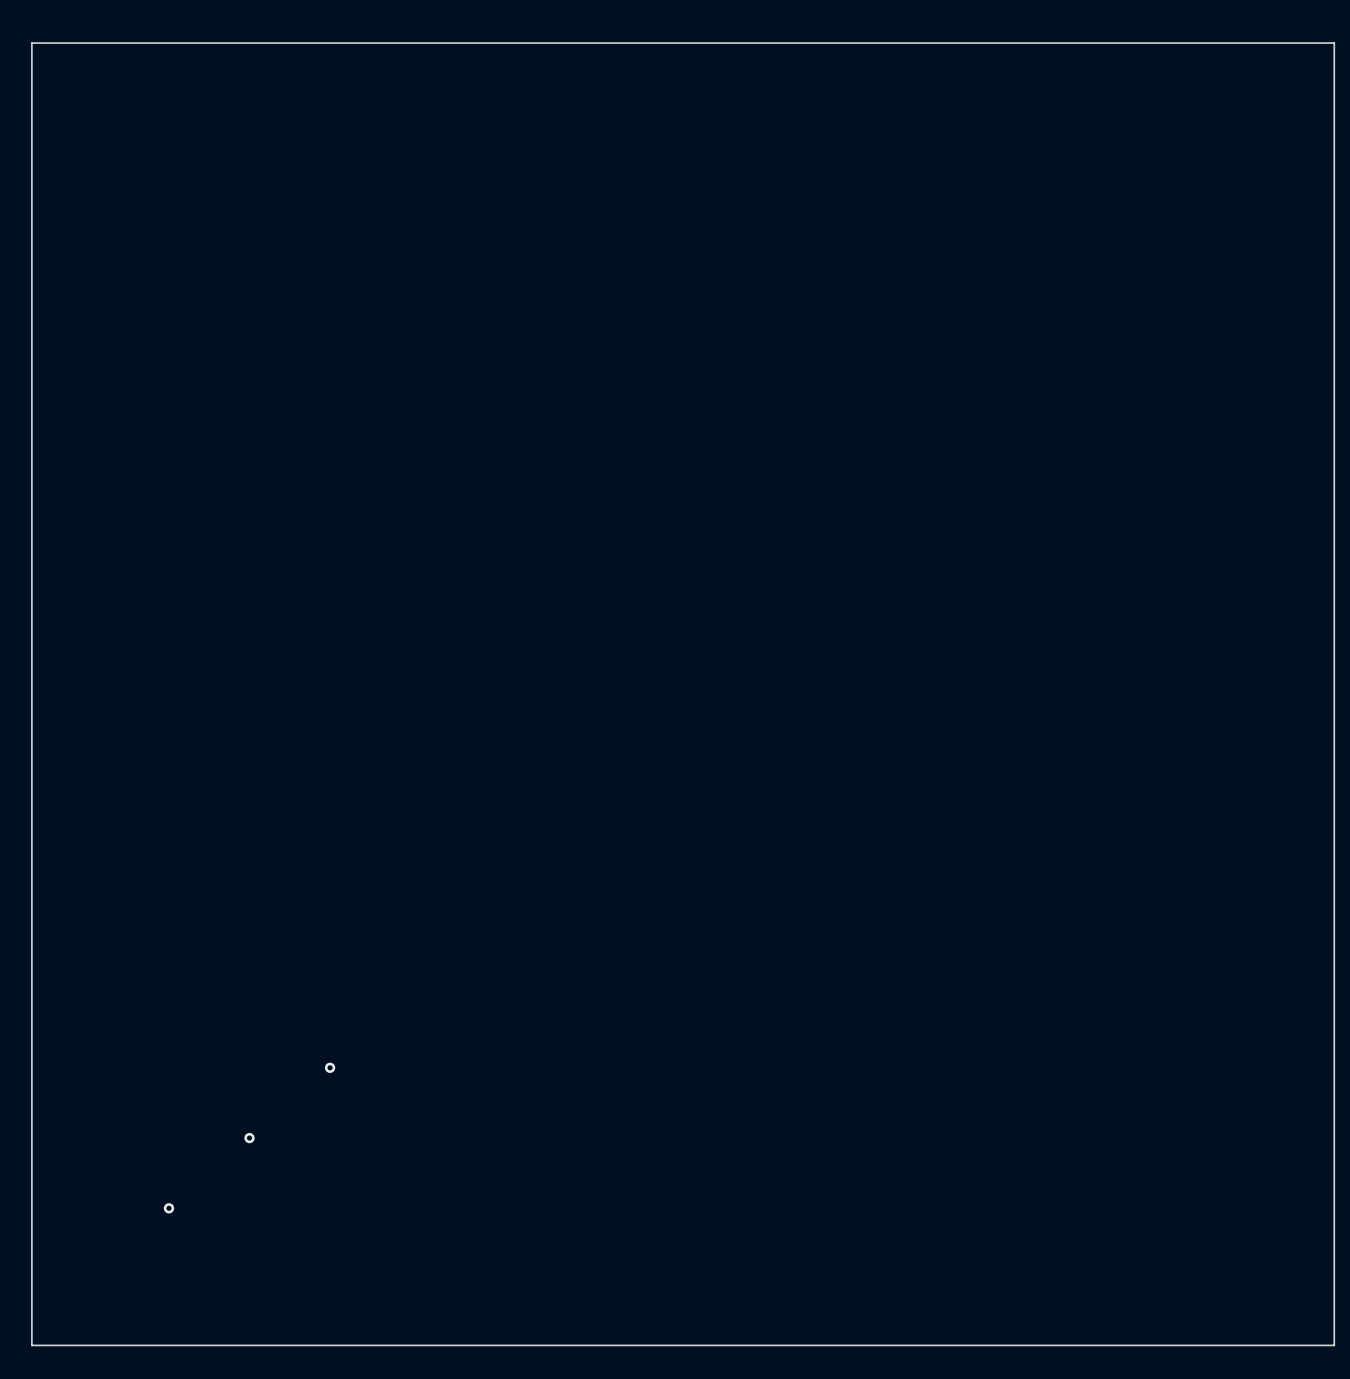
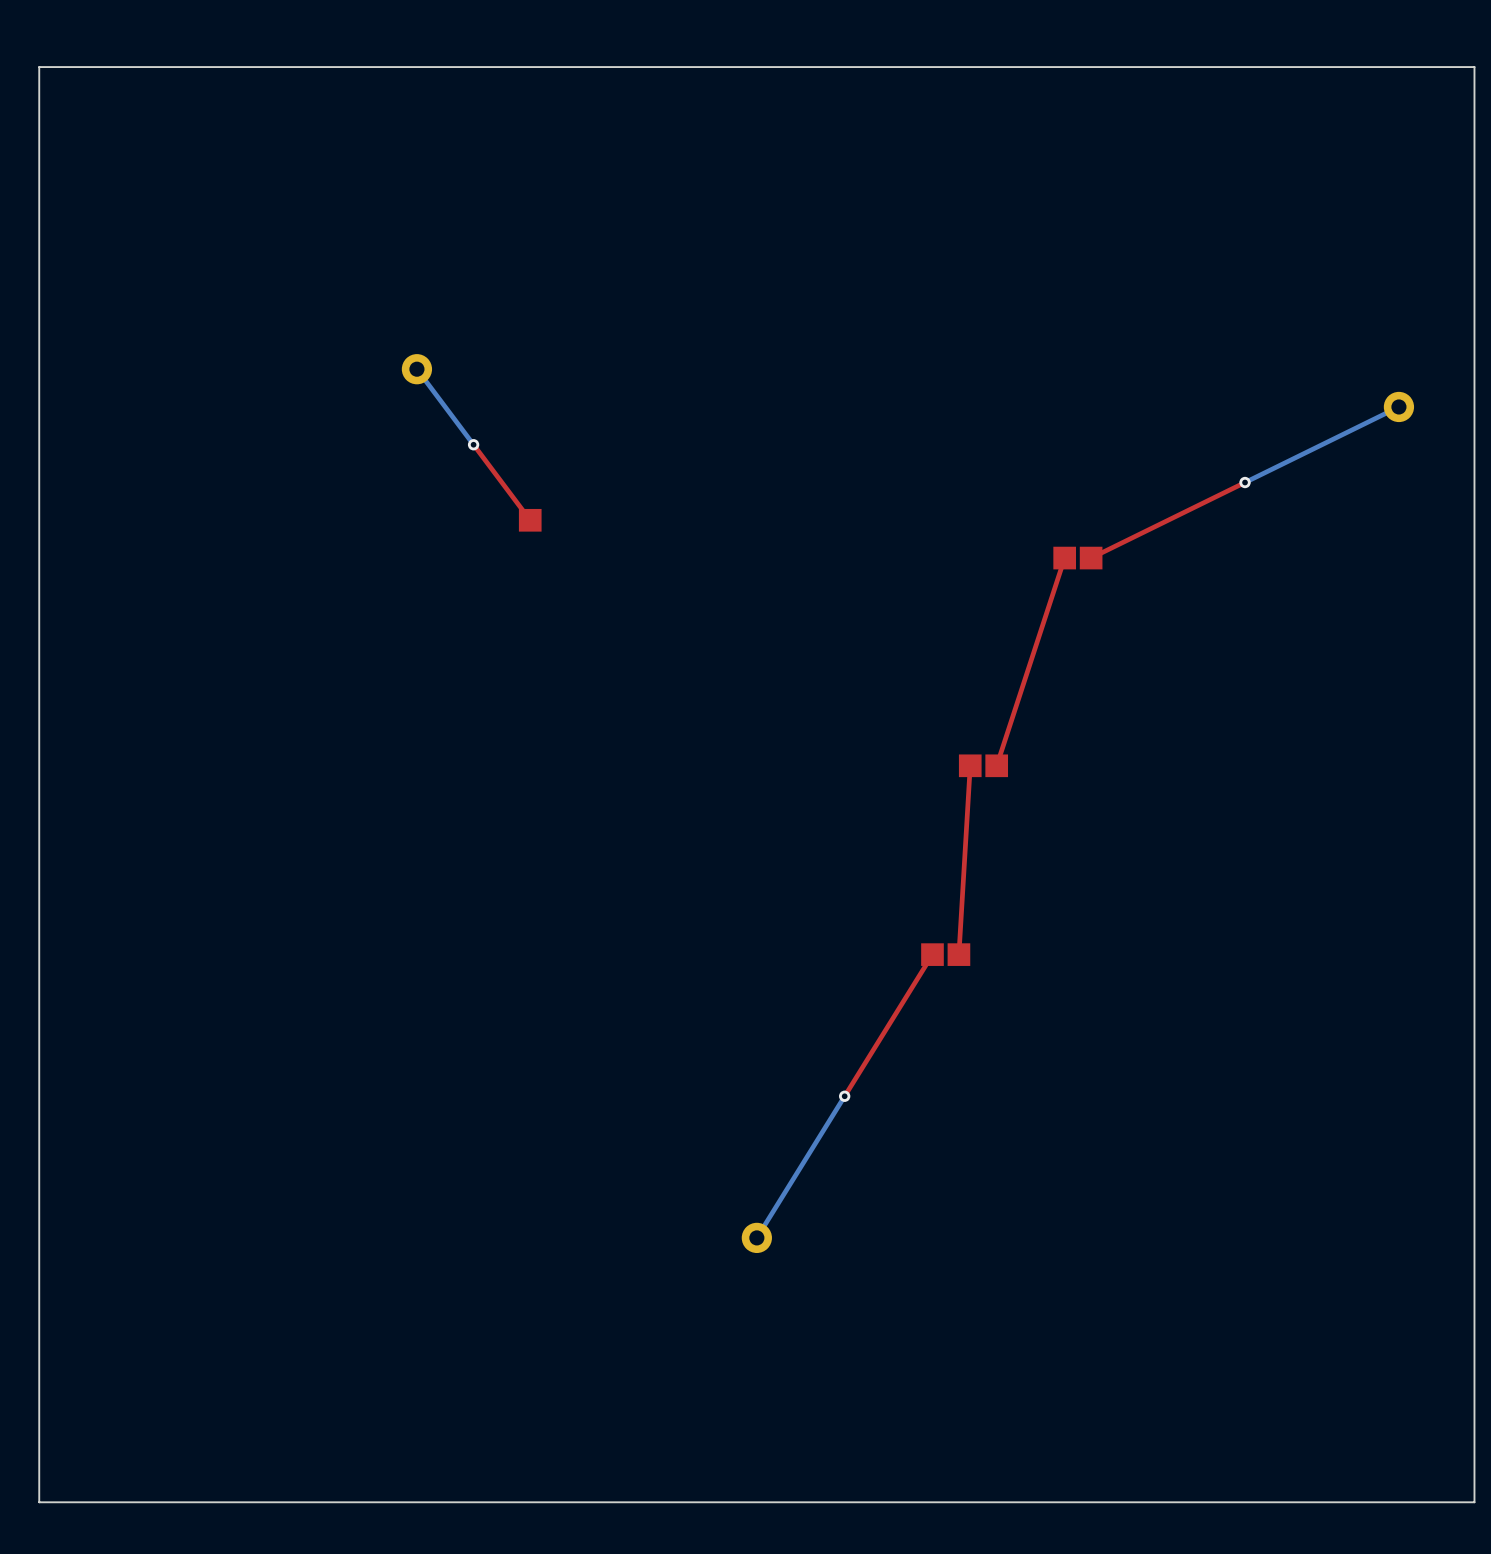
bottom track: none -> (416, 369) (473, 444)
part: none -> (416, 369)
bottom track: none -> (1398, 406) (1245, 482)
part: none -> (1398, 406)
top track: none -> (473, 444) (530, 520)
via: none -> (473, 444)
top track: none -> (1245, 482) (1091, 558)
via: none -> (1245, 482)
part: none -> (530, 520)
top track: none -> (1064, 558) (996, 765)
part: none -> (1077, 558)
top track: none -> (970, 765) (958, 954)
part: none -> (983, 765)
top track: none -> (932, 954) (844, 1096)
part: none -> (945, 954)
bottom track: none -> (844, 1096) (756, 1237)
via: none -> (844, 1096)
via: (330, 1067) -> none
part: none -> (756, 1237)
via: (249, 1138) -> none
via: (168, 1208) -> none

